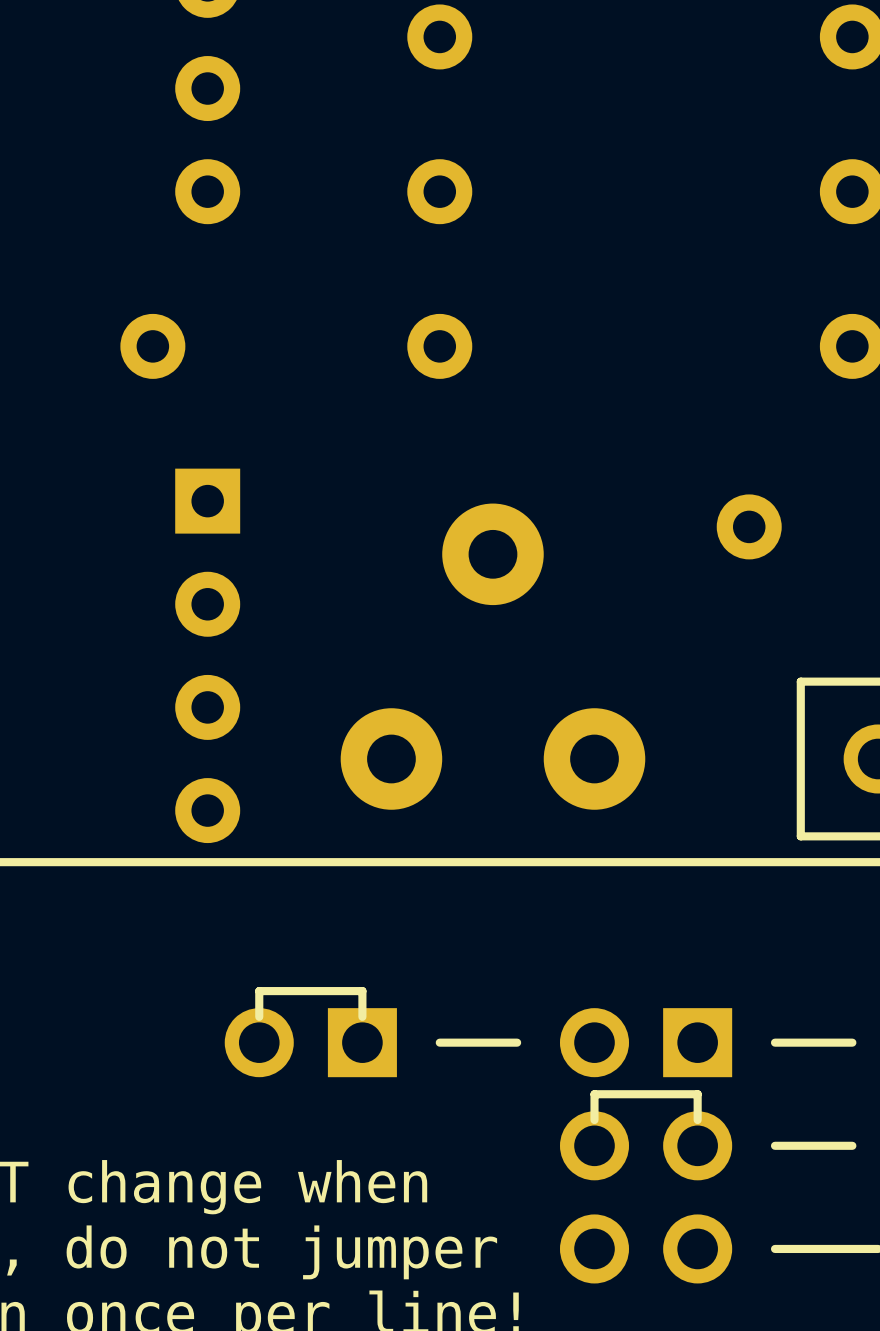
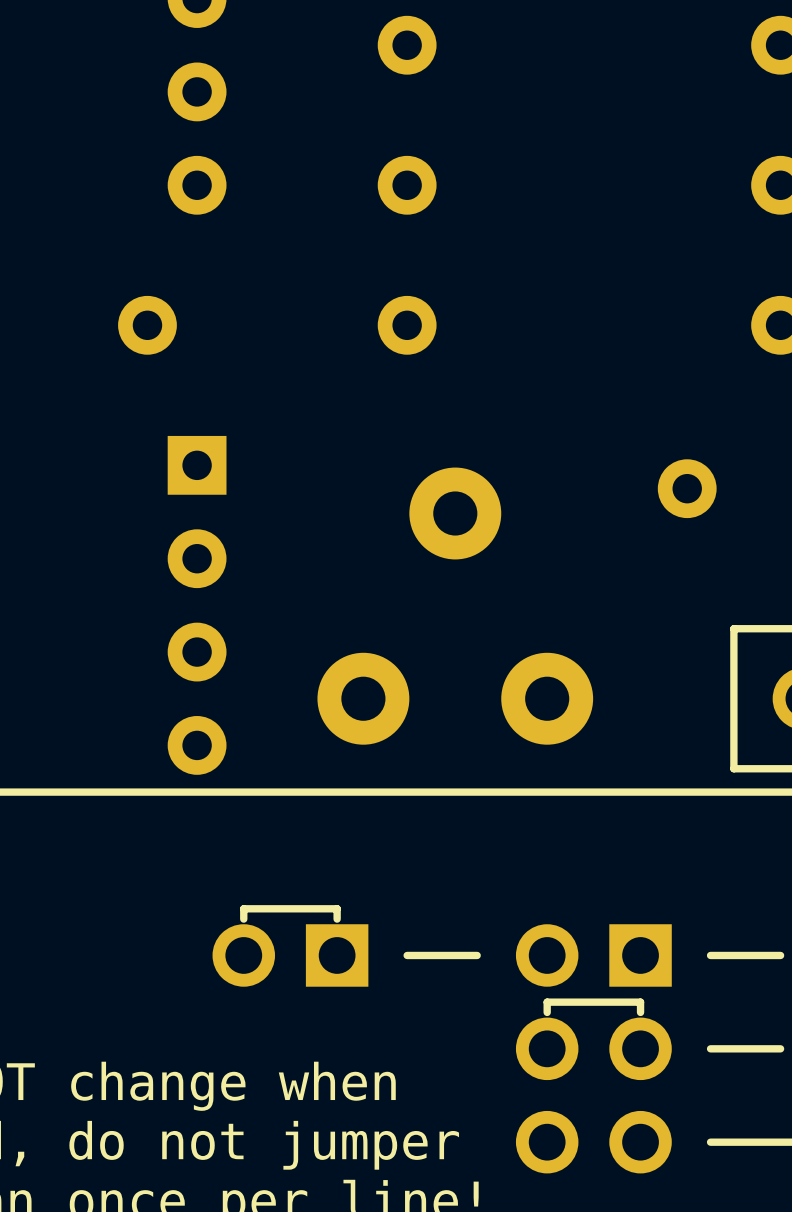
line: (259, 1002) (259, 1016) -> none
line: (362, 1002) (362, 1016) -> none
line: (594, 1105) (594, 1120) -> none
line: (697, 1105) (697, 1120) -> none

